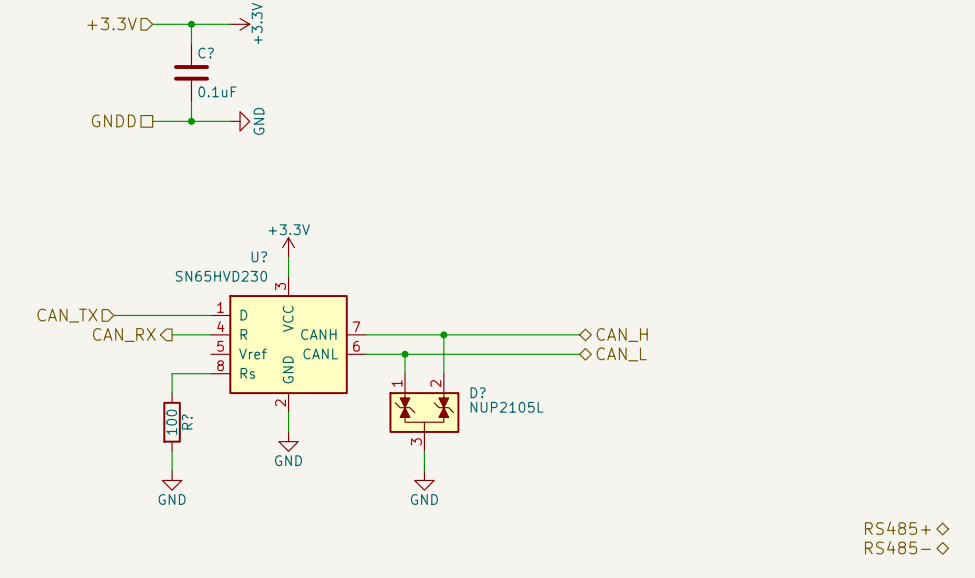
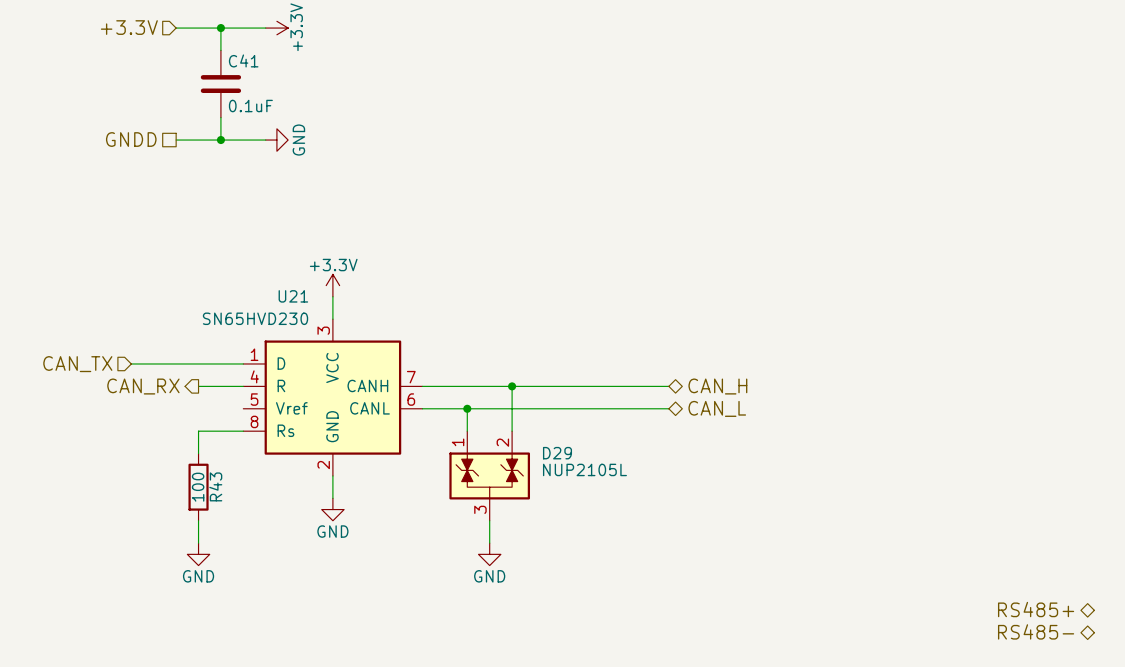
C? name: C? (206, 53) -> C41 (243, 60)
U? name: U? (259, 256) -> U21 (293, 296)
D? name: D? (478, 392) -> D29 (557, 453)
R? name: R? (187, 422) -> R43 (215, 486)

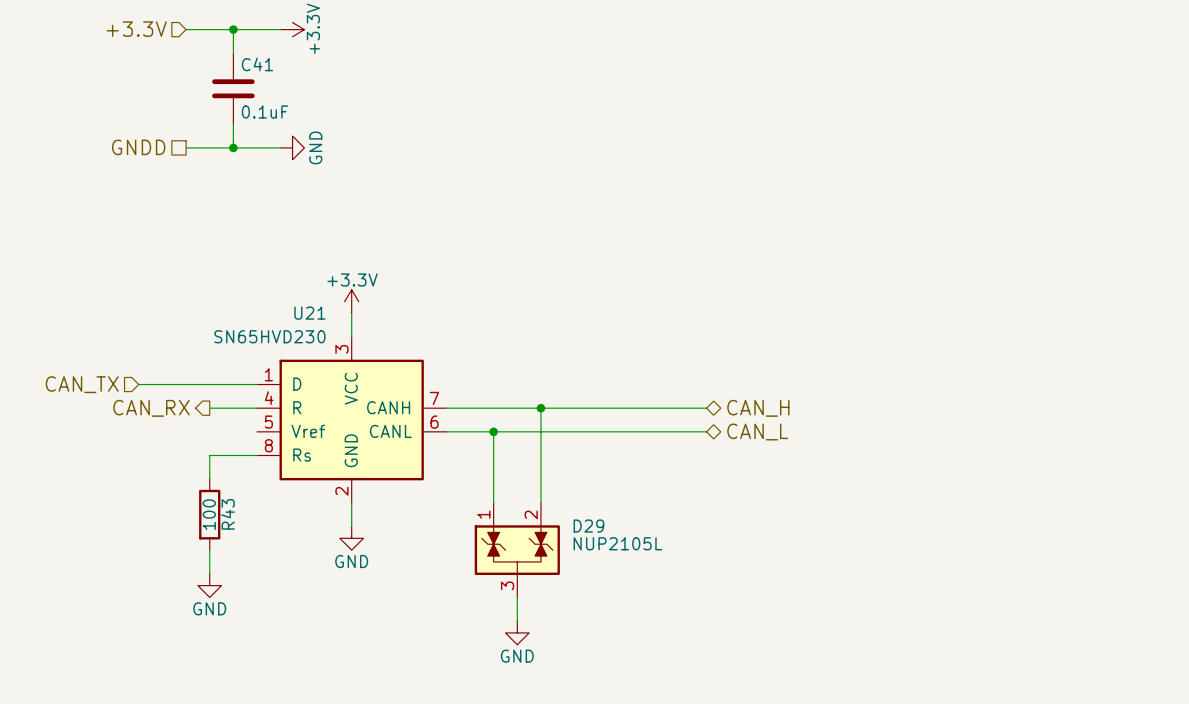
D29 position: (489, 475) -> (517, 550)
power symbol position: GND (489, 554) -> GND (517, 632)
hierarchical label: RS485+ (1036, 609) -> none
hierarchical label: RS485- (1036, 631) -> none

